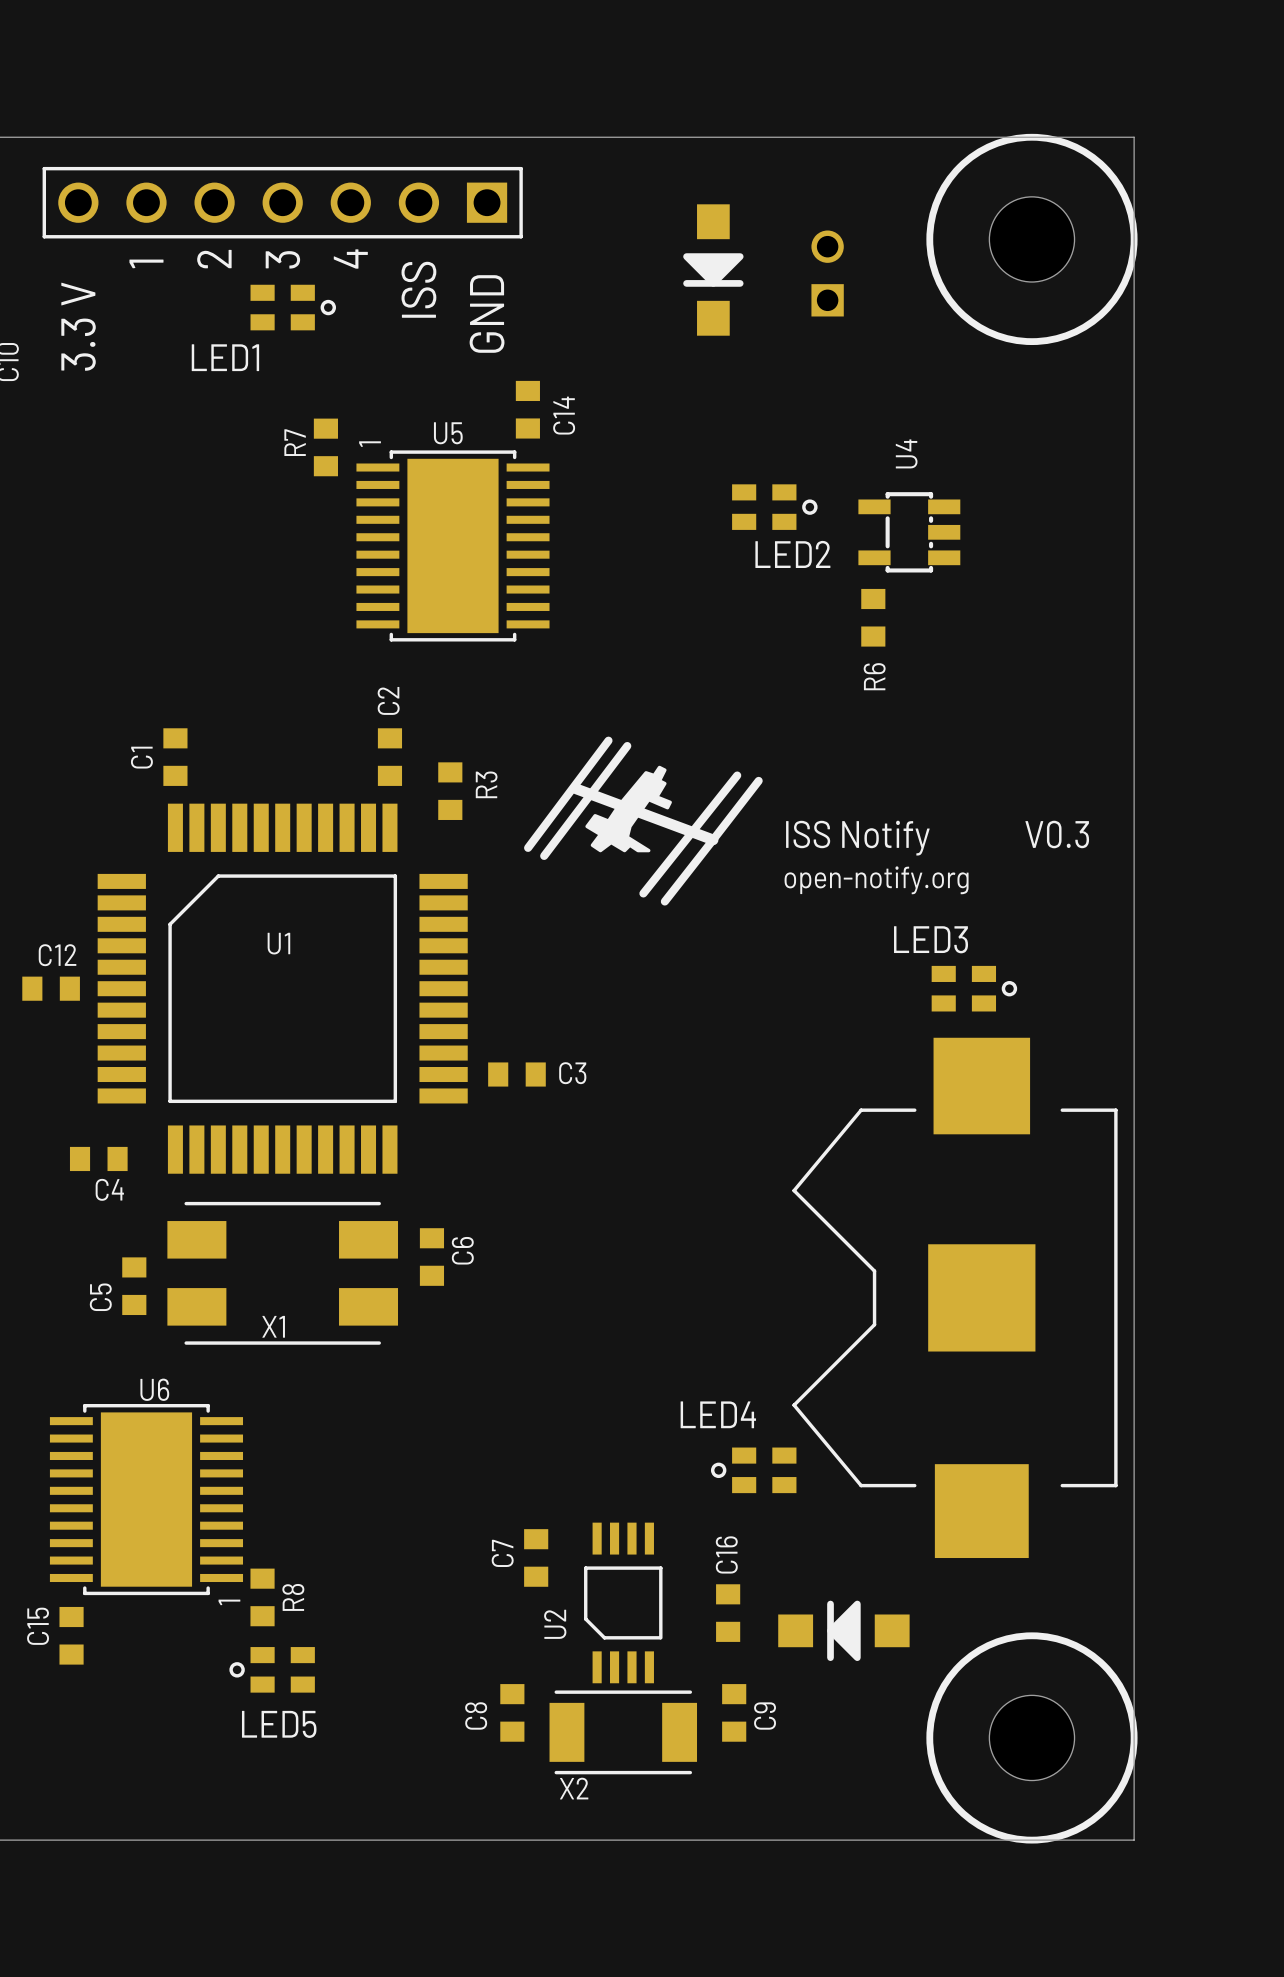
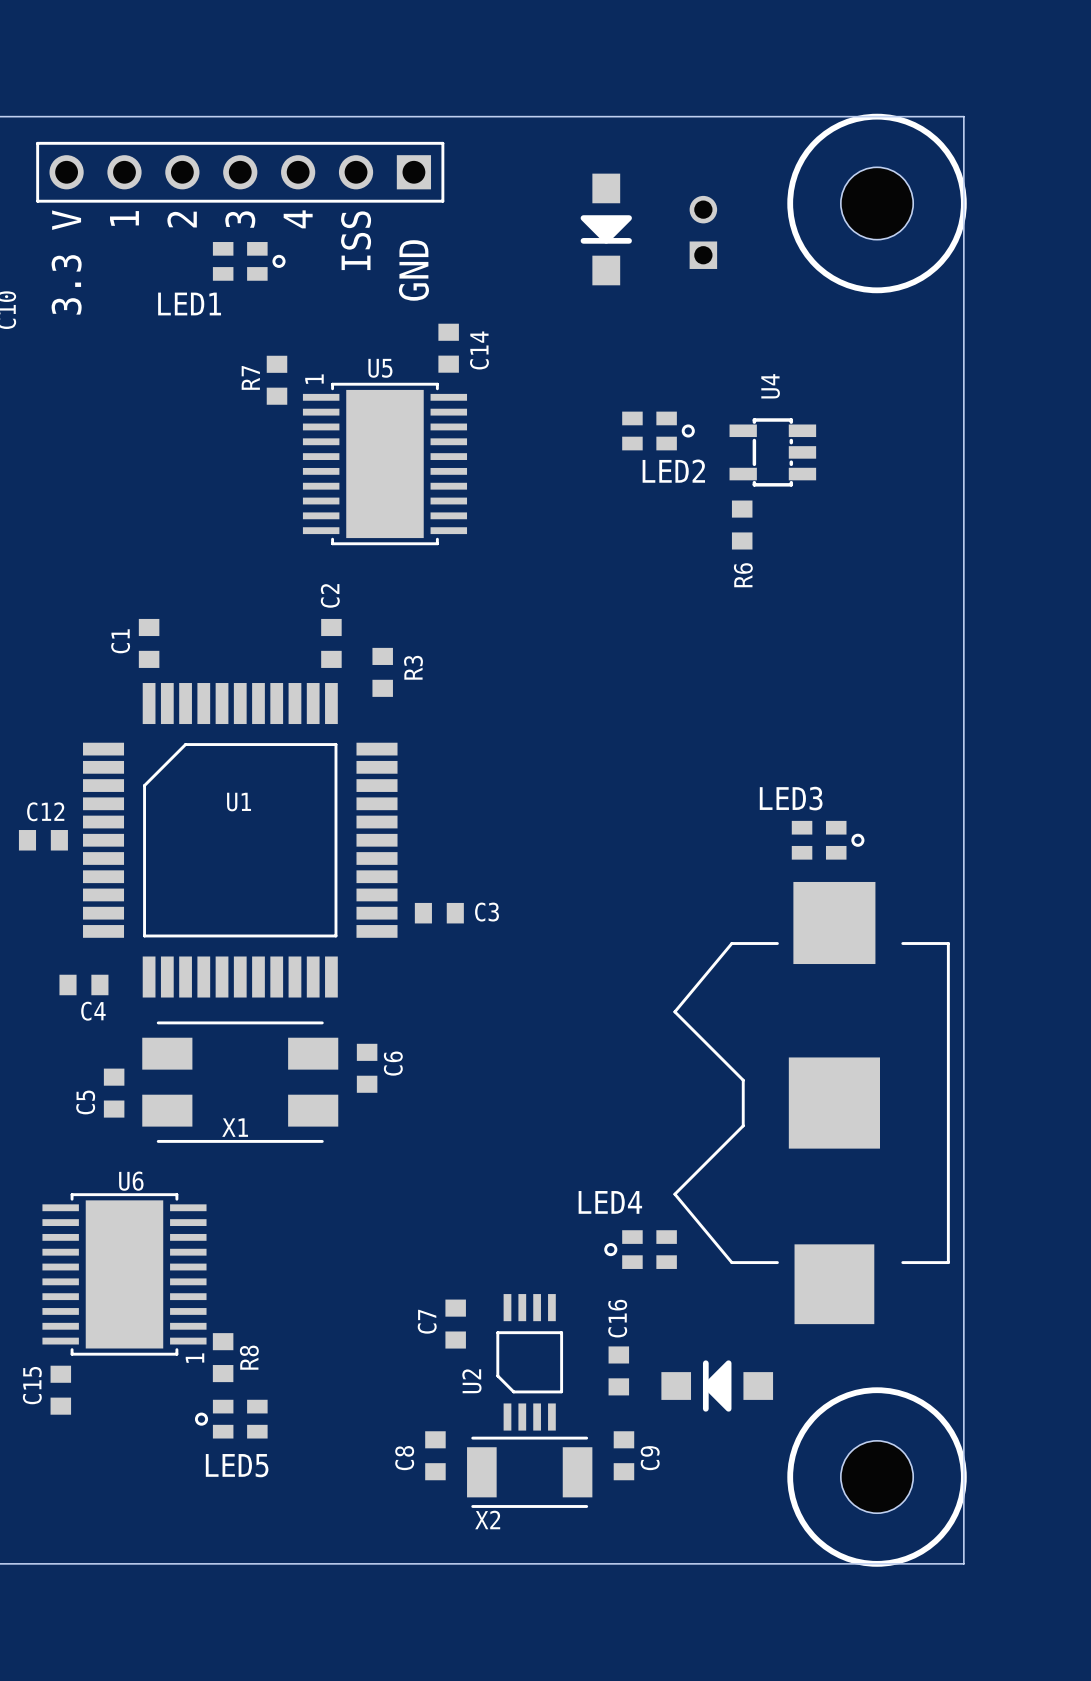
drawing: [524, 736, 763, 906] -> none

